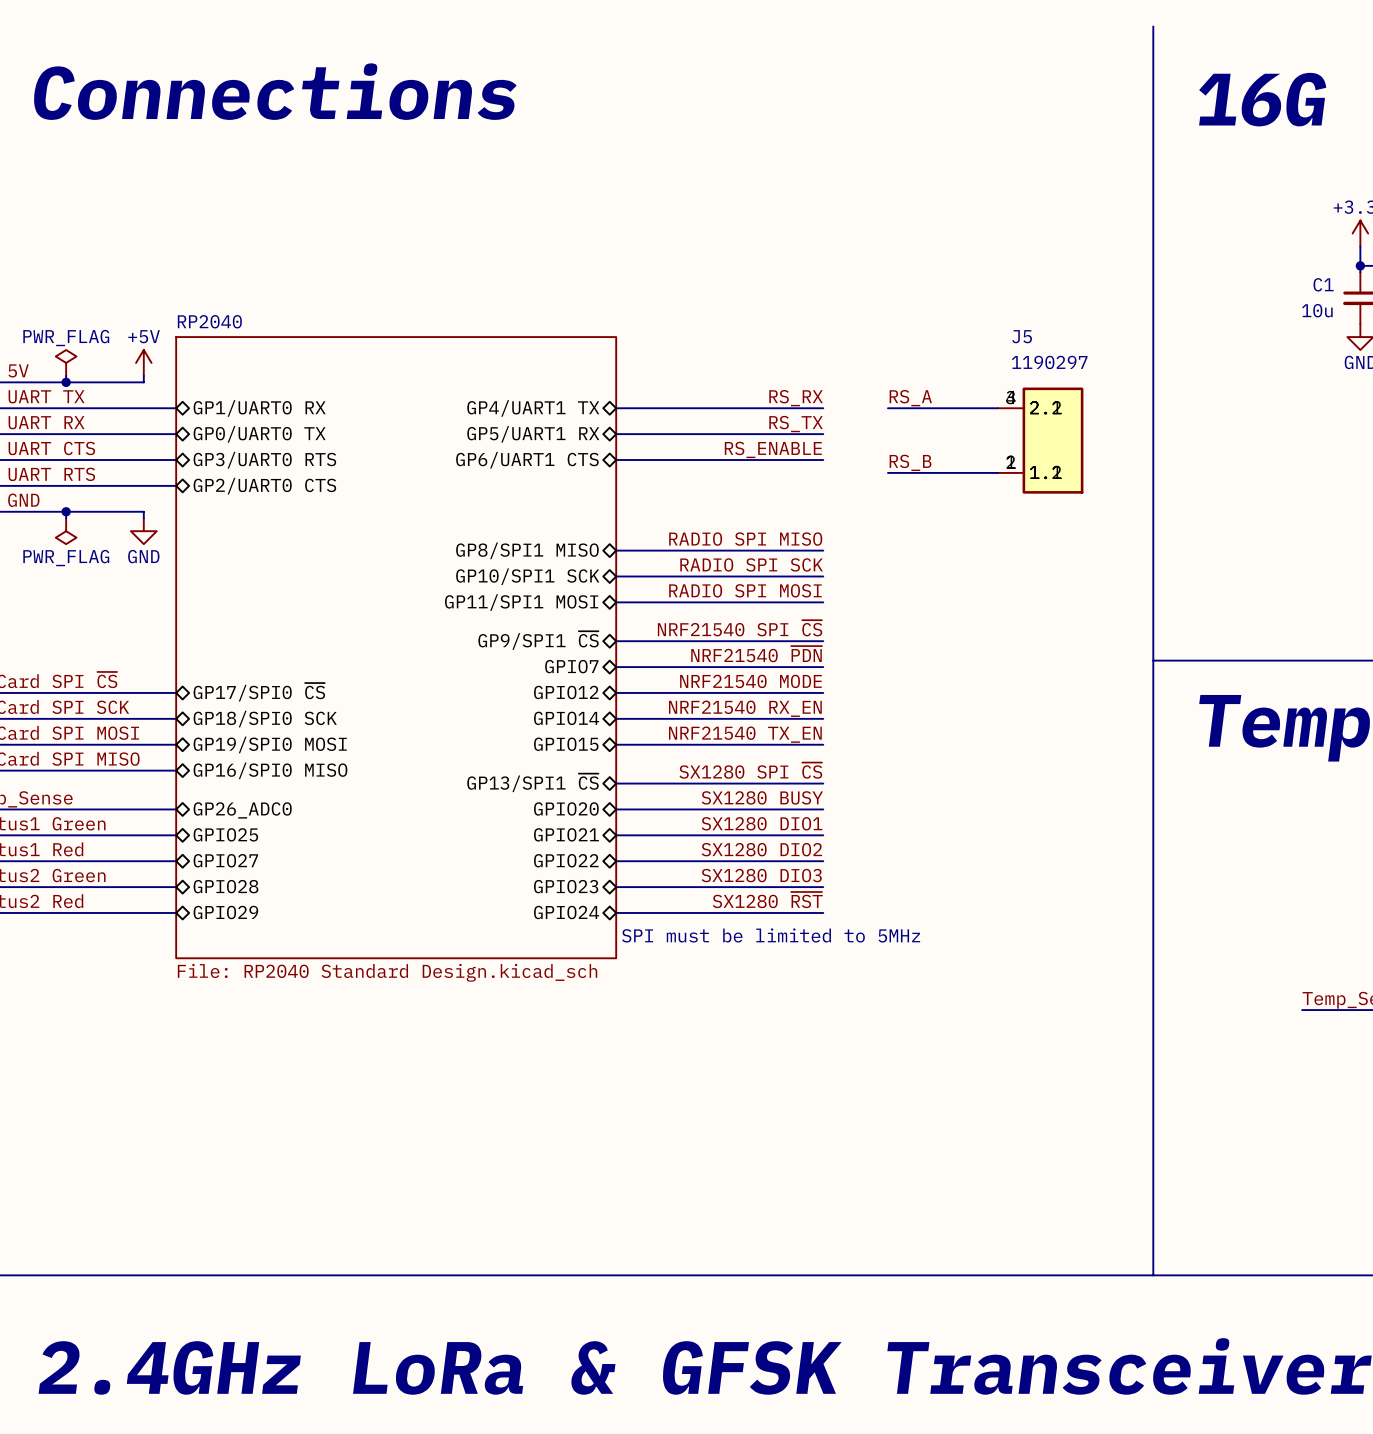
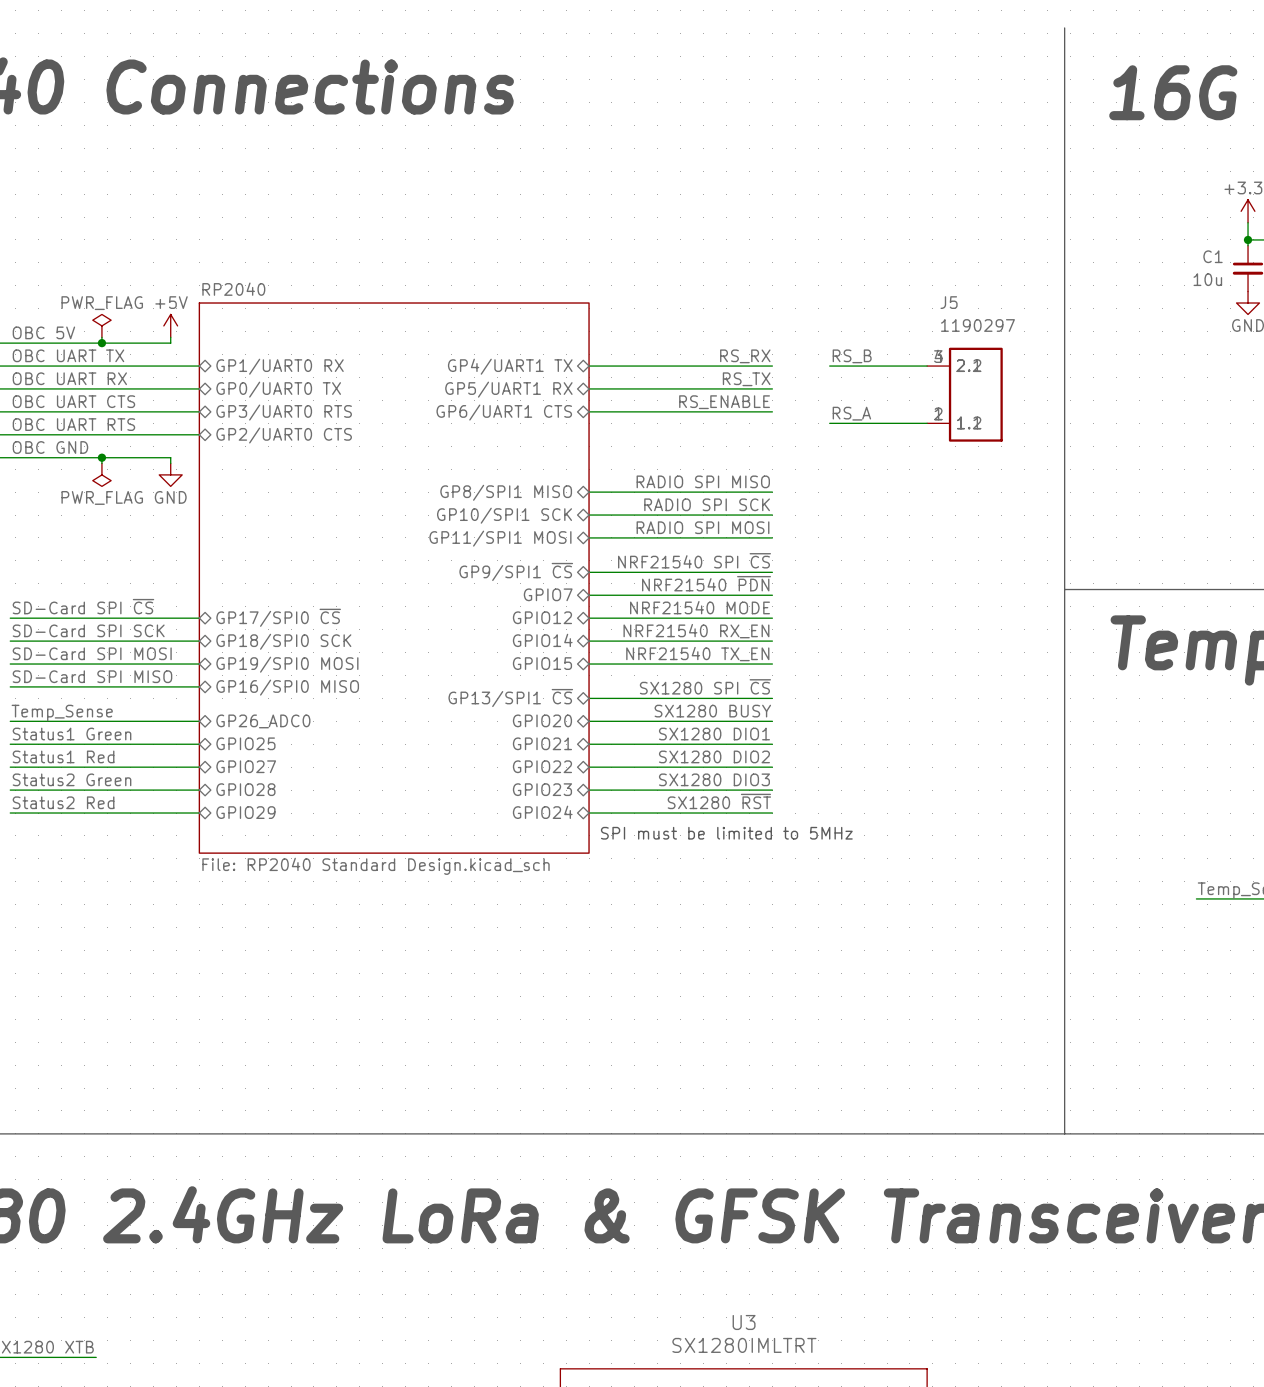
label: RS_A (910, 398) -> RS_B (852, 356)
label: RS_B (910, 462) -> RS_A (851, 413)

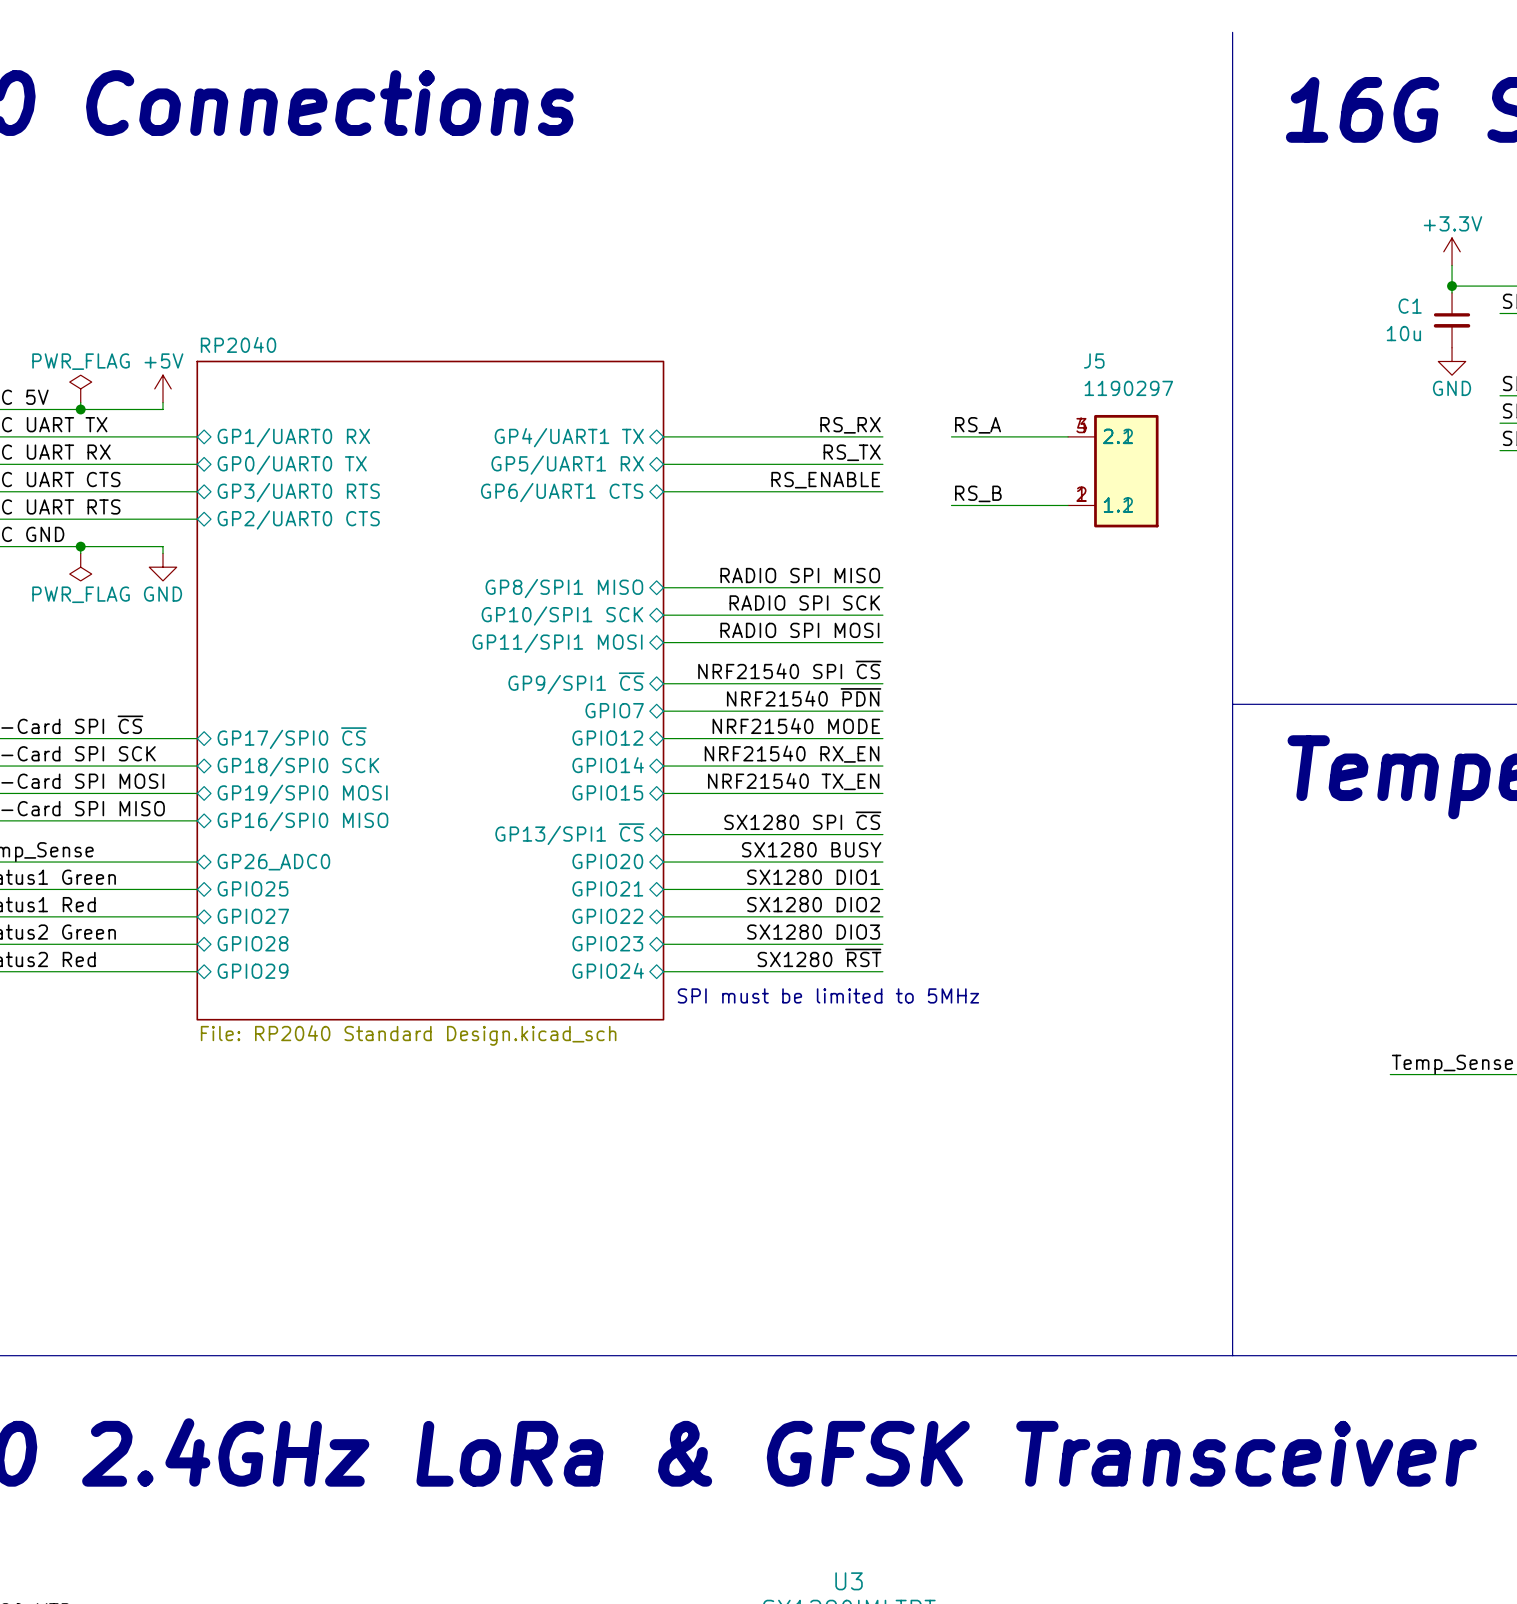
label: RS_B (852, 356) -> RS_A (978, 425)
label: RS_A (851, 413) -> RS_B (978, 493)

